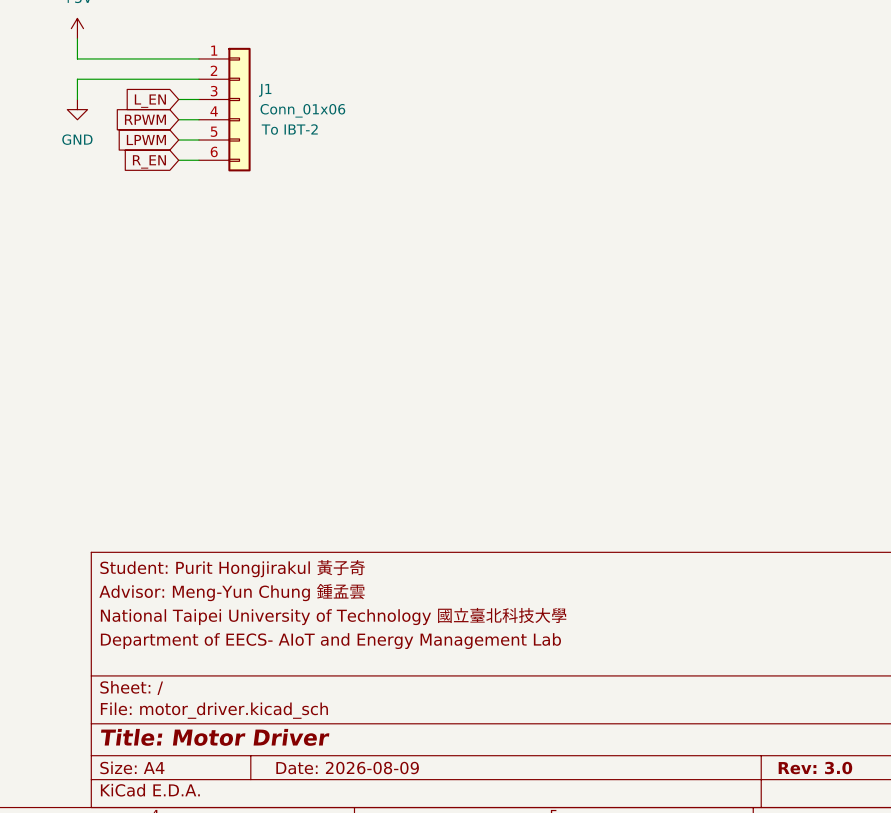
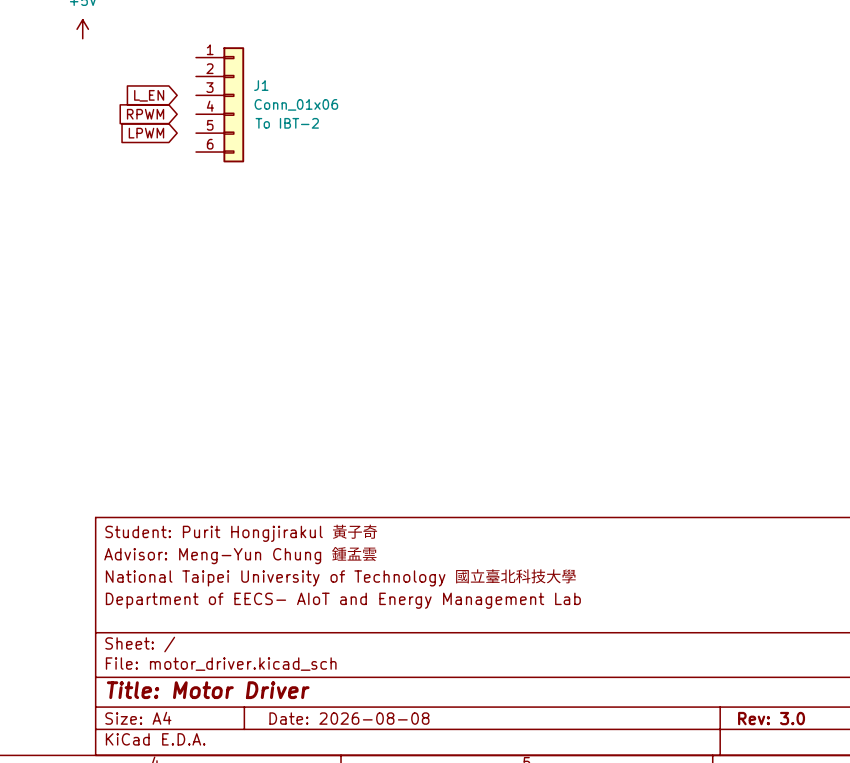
wire: (77, 38) (77, 58) (198, 58) -> none
wire: (198, 79) (77, 79) (77, 99) -> none
wire: (178, 99) (198, 99) -> none
power symbol: GND (77, 109) -> none
wire: (178, 119) (198, 119) -> none
wire: (178, 140) (198, 140) -> none
wire: (178, 160) (198, 160) -> none
global label: R_EN (149, 161) -> none
title block: Date: 2026-08-09 (347, 768) -> Date: 2026-08-08 (349, 718)

